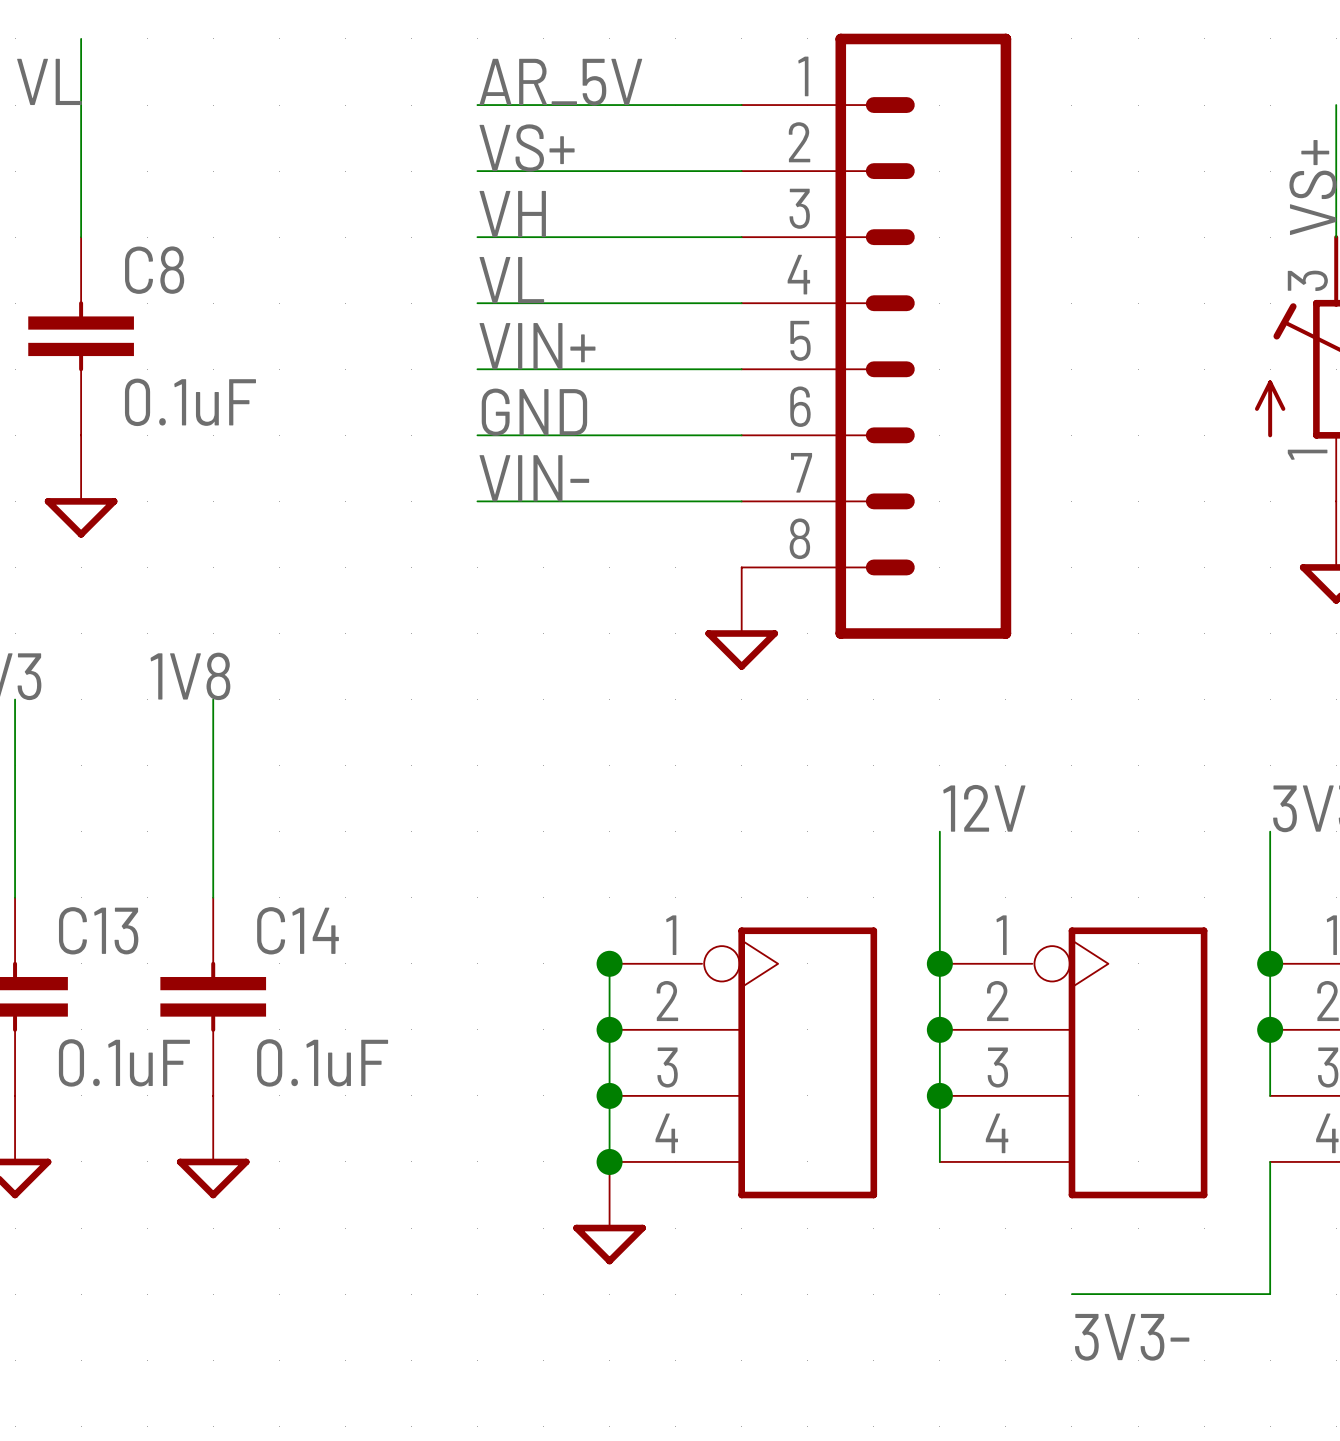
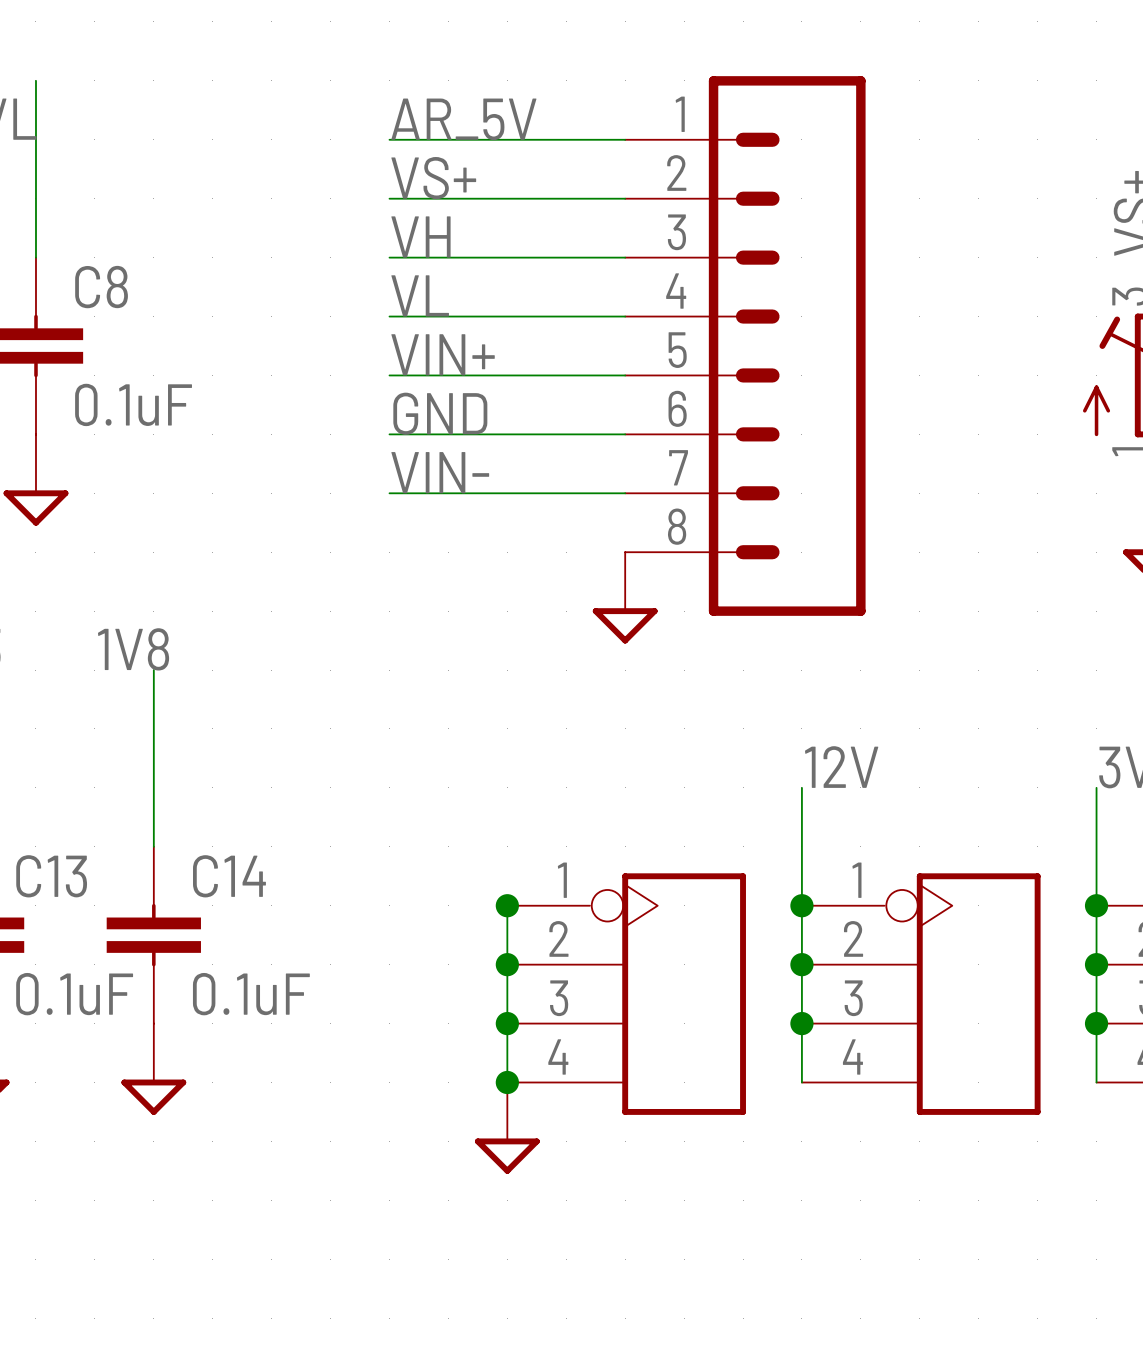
junction: none -> (1096, 1023)
wire: (1270, 1161) (1270, 1294) (1071, 1294) -> (1096, 1082) (1096, 1023)
label: 3V3- (1132, 1337) -> none

